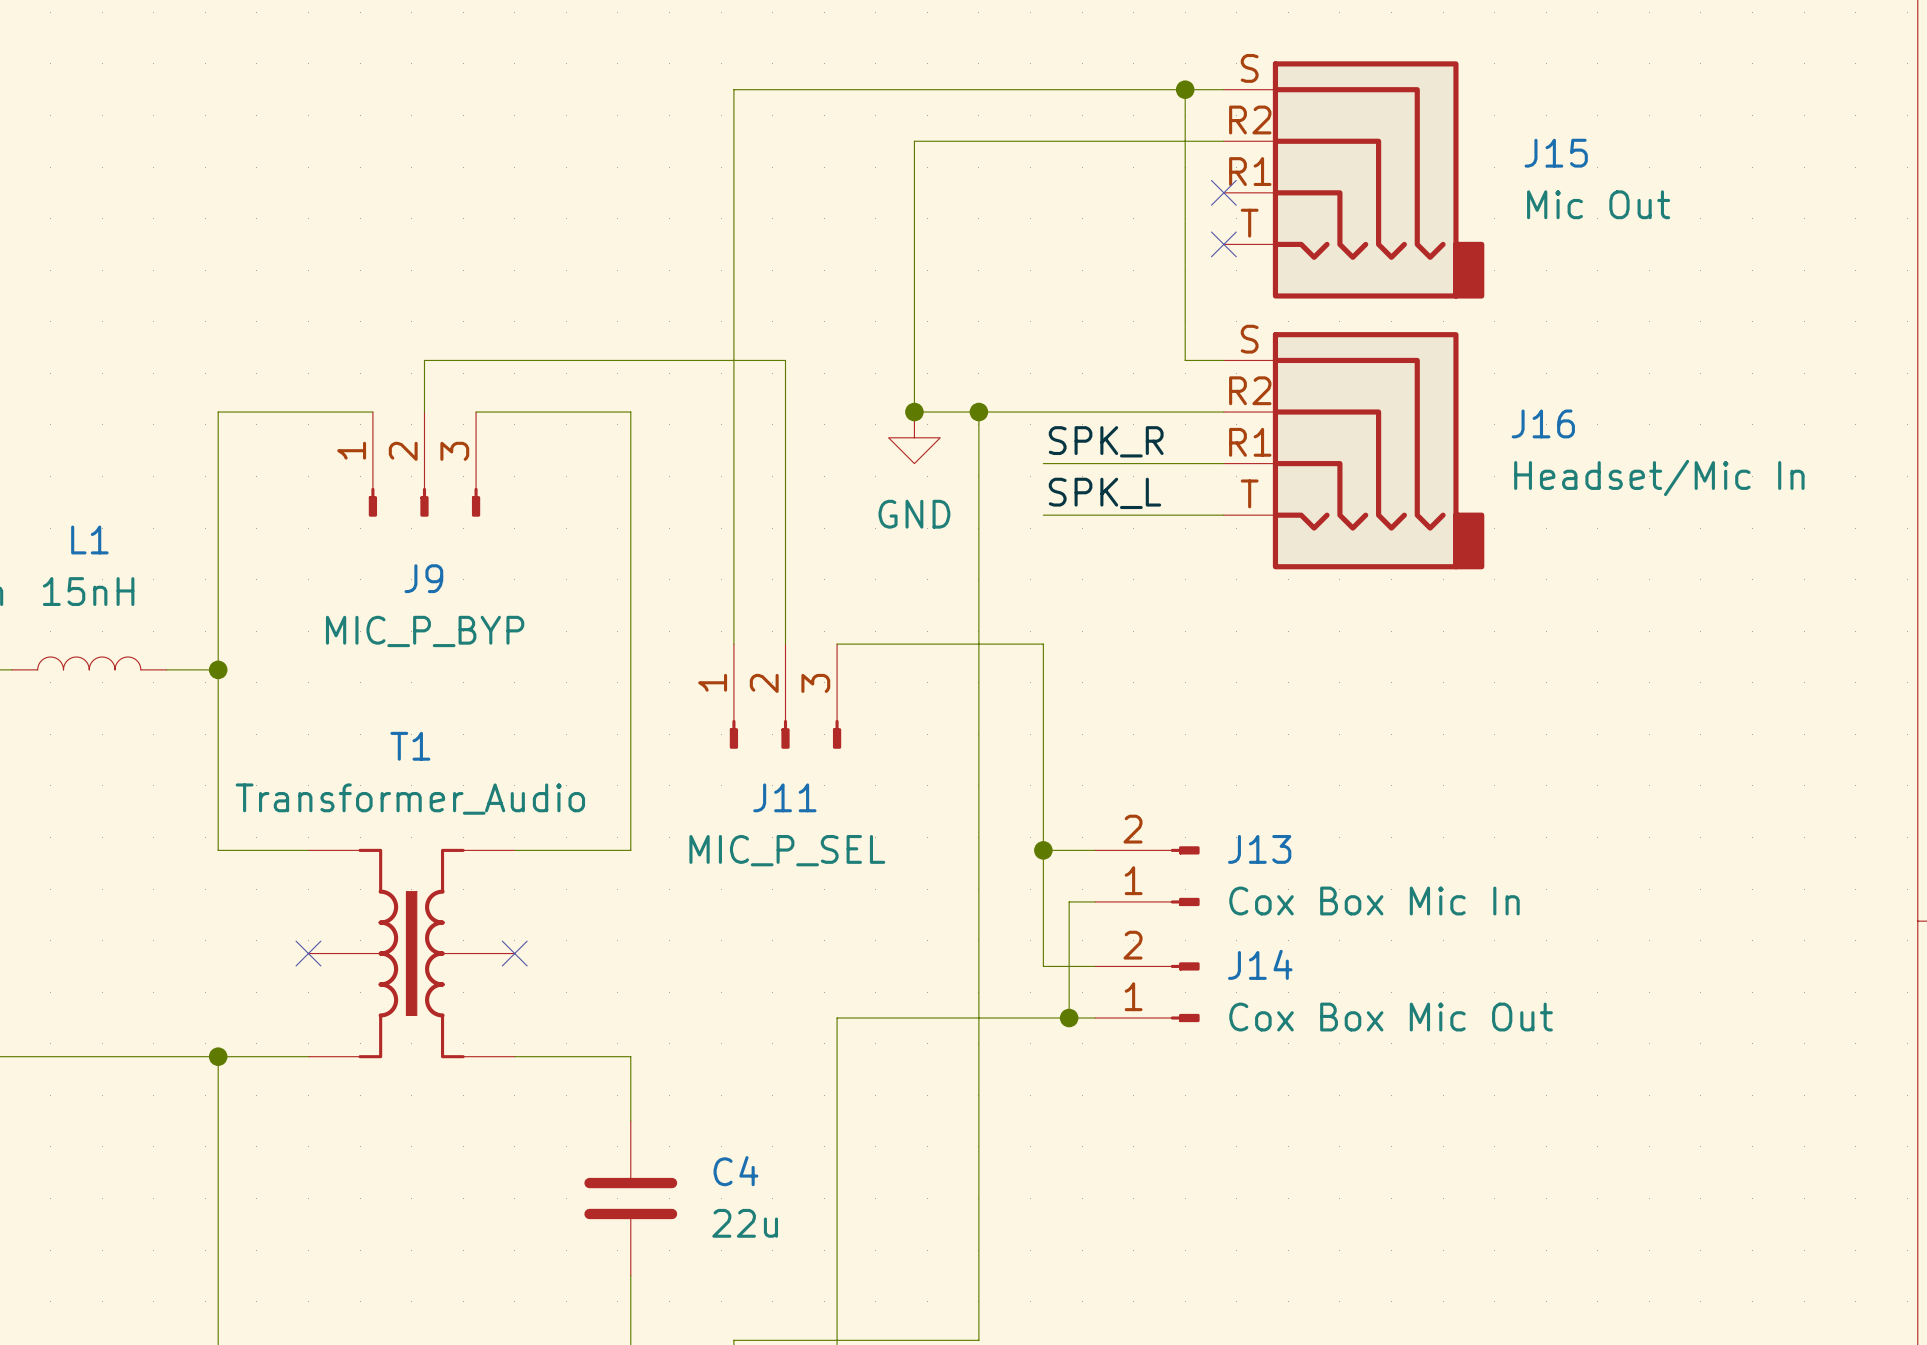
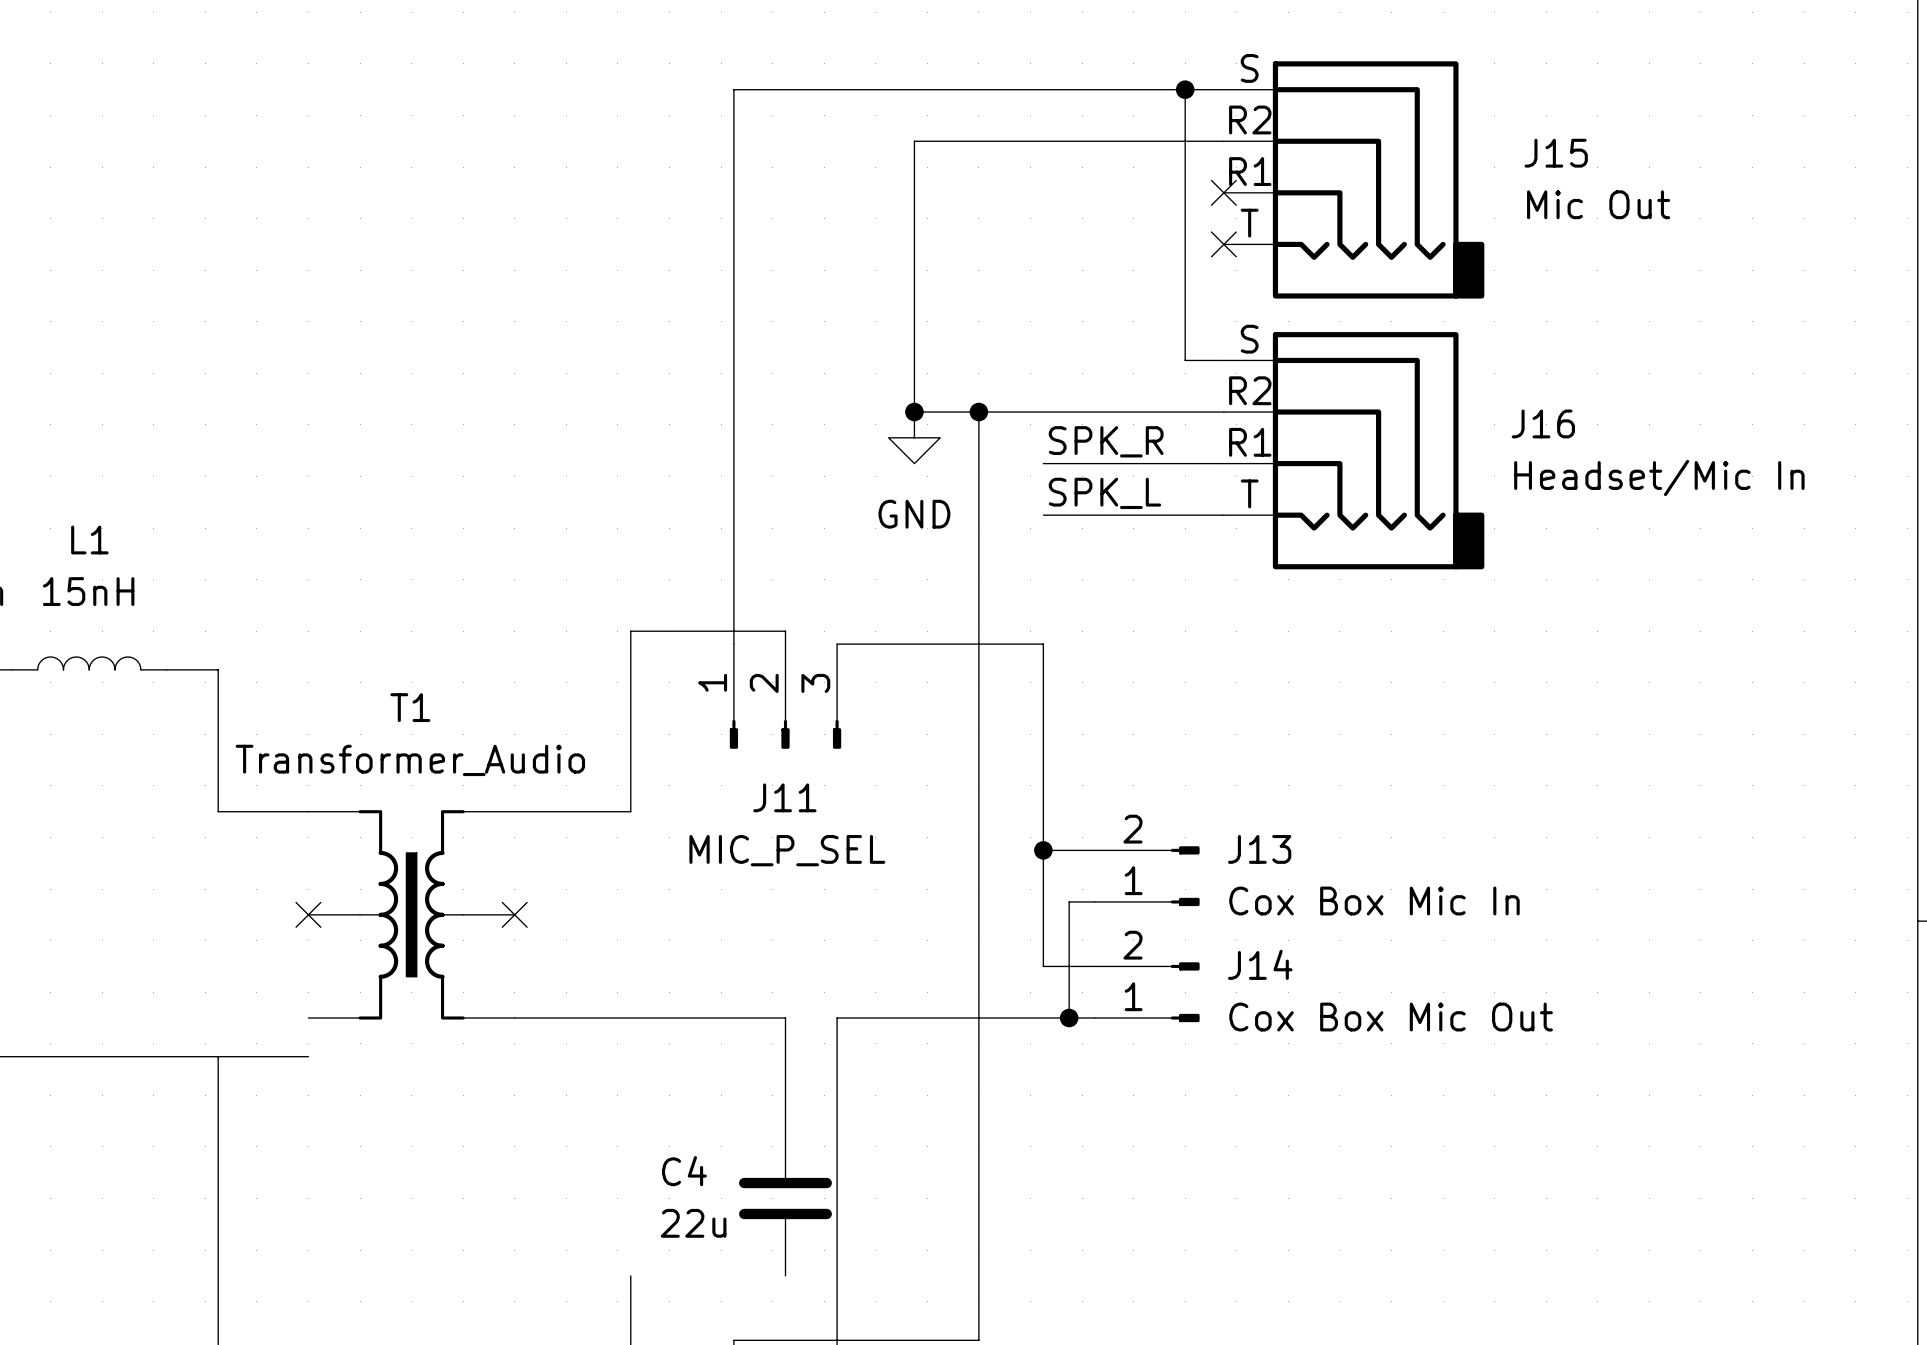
wire: (372, 412) (218, 412) (218, 669) -> none
wire: (424, 412) (424, 360) (785, 360) (785, 631) -> (630, 631) (785, 631)
wire: (476, 412) (630, 412) (630, 631) -> none
J9: MIC_P_BYP (424, 464) -> none
junction: (218, 669) -> none
wire: (218, 811) (218, 850) (308, 850) -> (218, 811) (308, 811)
wire: (630, 811) (630, 850) (514, 850) -> (630, 811) (514, 811)
no-connect mark position: (308, 953) -> (308, 914)
T1 position: (411, 953) -> (411, 914)
no-connect mark position: (514, 953) -> (514, 914)
wire: none -> (514, 1018) (785, 1018) (785, 1121)
junction: (218, 1056) -> none
wire: (514, 1056) (630, 1056) (630, 1121) -> none
C4 name position: C4 (735, 1171) -> C4 (684, 1171)
C4 position: (630, 1198) -> (785, 1198)
C4 value position: 22u (745, 1223) -> 22u (693, 1223)

